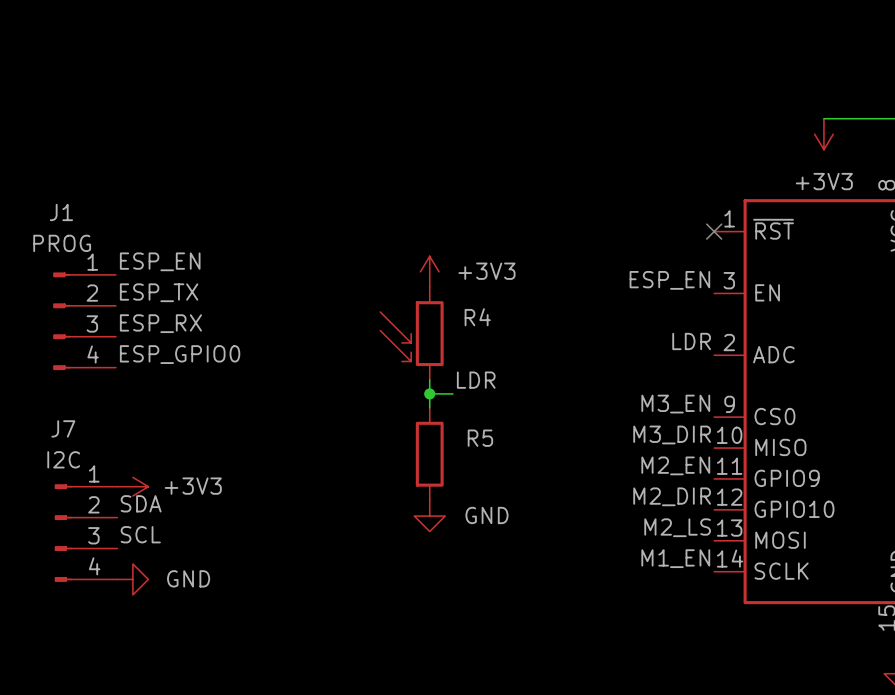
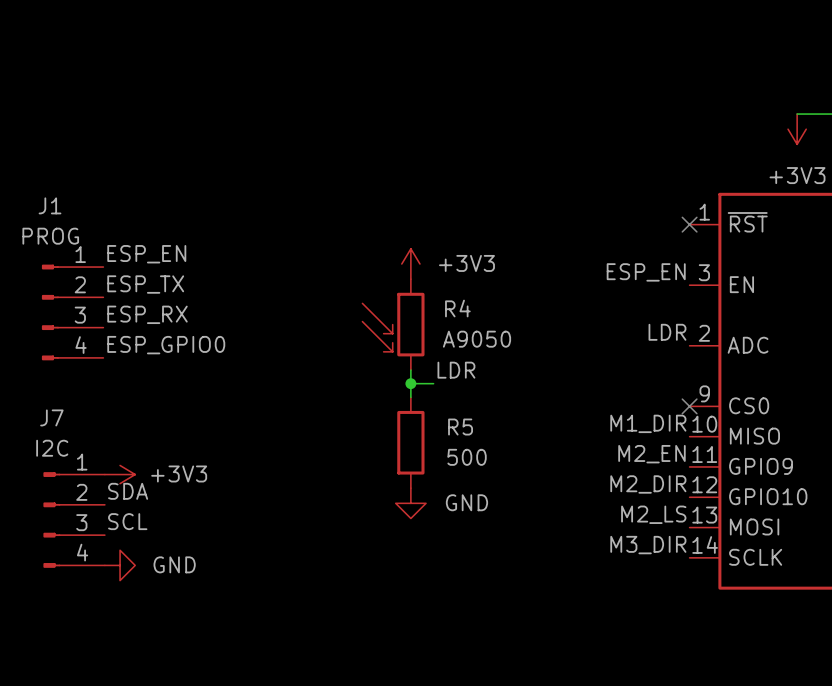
R4 value: none -> A9050 (476, 339)
label: M3_EN (675, 404) -> none
no-connect mark: none -> (689, 406)
label: M3_DIR (672, 434) -> M1_DIR (648, 423)
R5 value: none -> 500 (467, 457)
label: M1_EN (675, 558) -> M3_DIR (648, 545)

